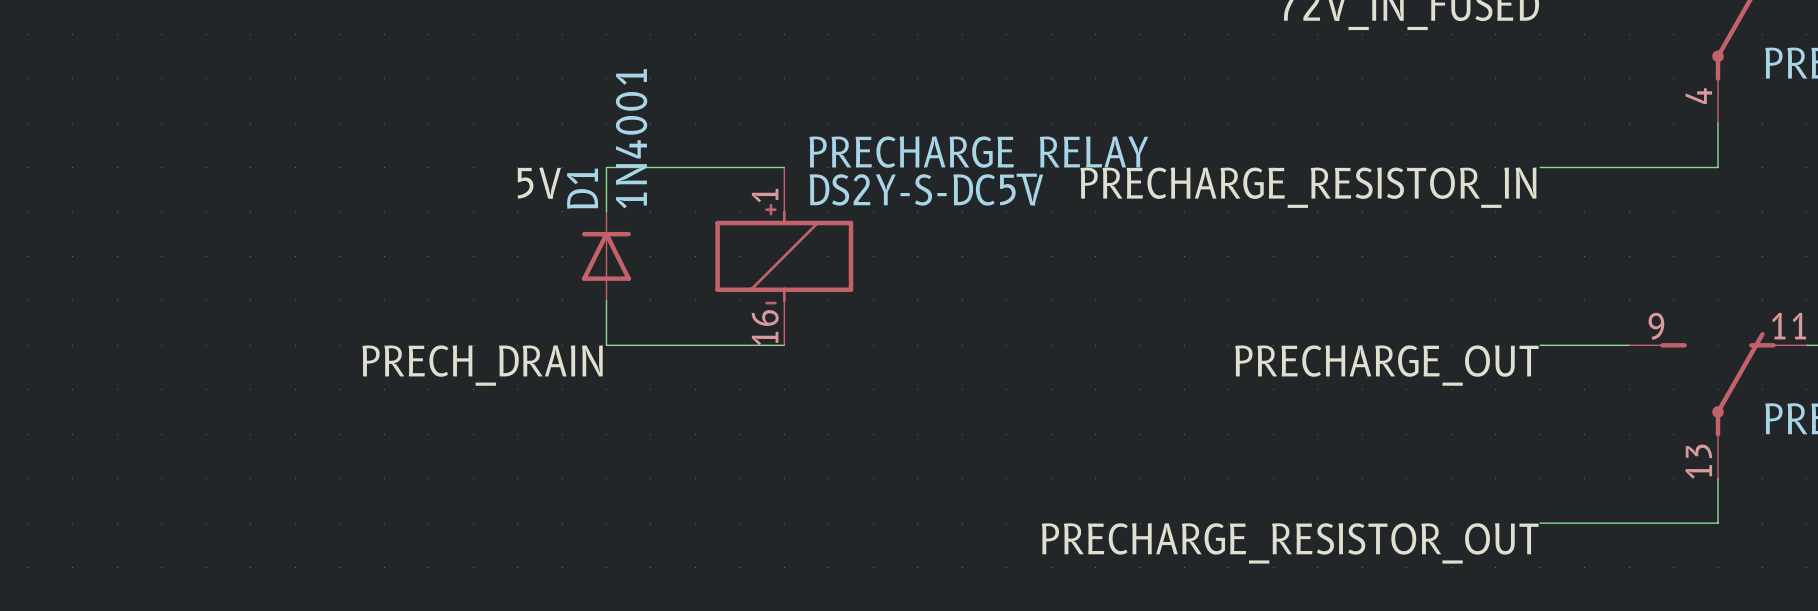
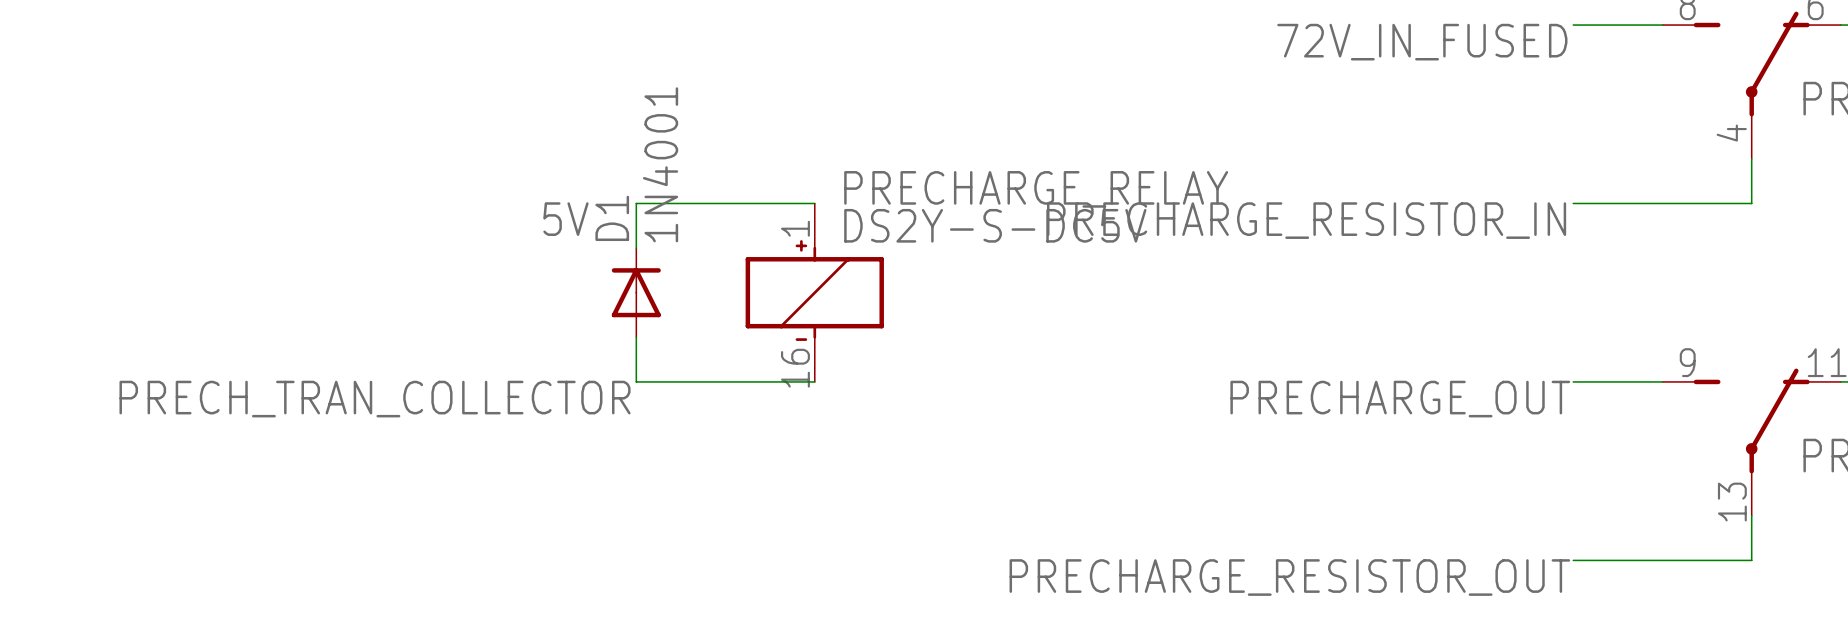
label: PRECH_DRAIN (482, 365) -> PRECH_TRAN_COLLECTOR (375, 399)

